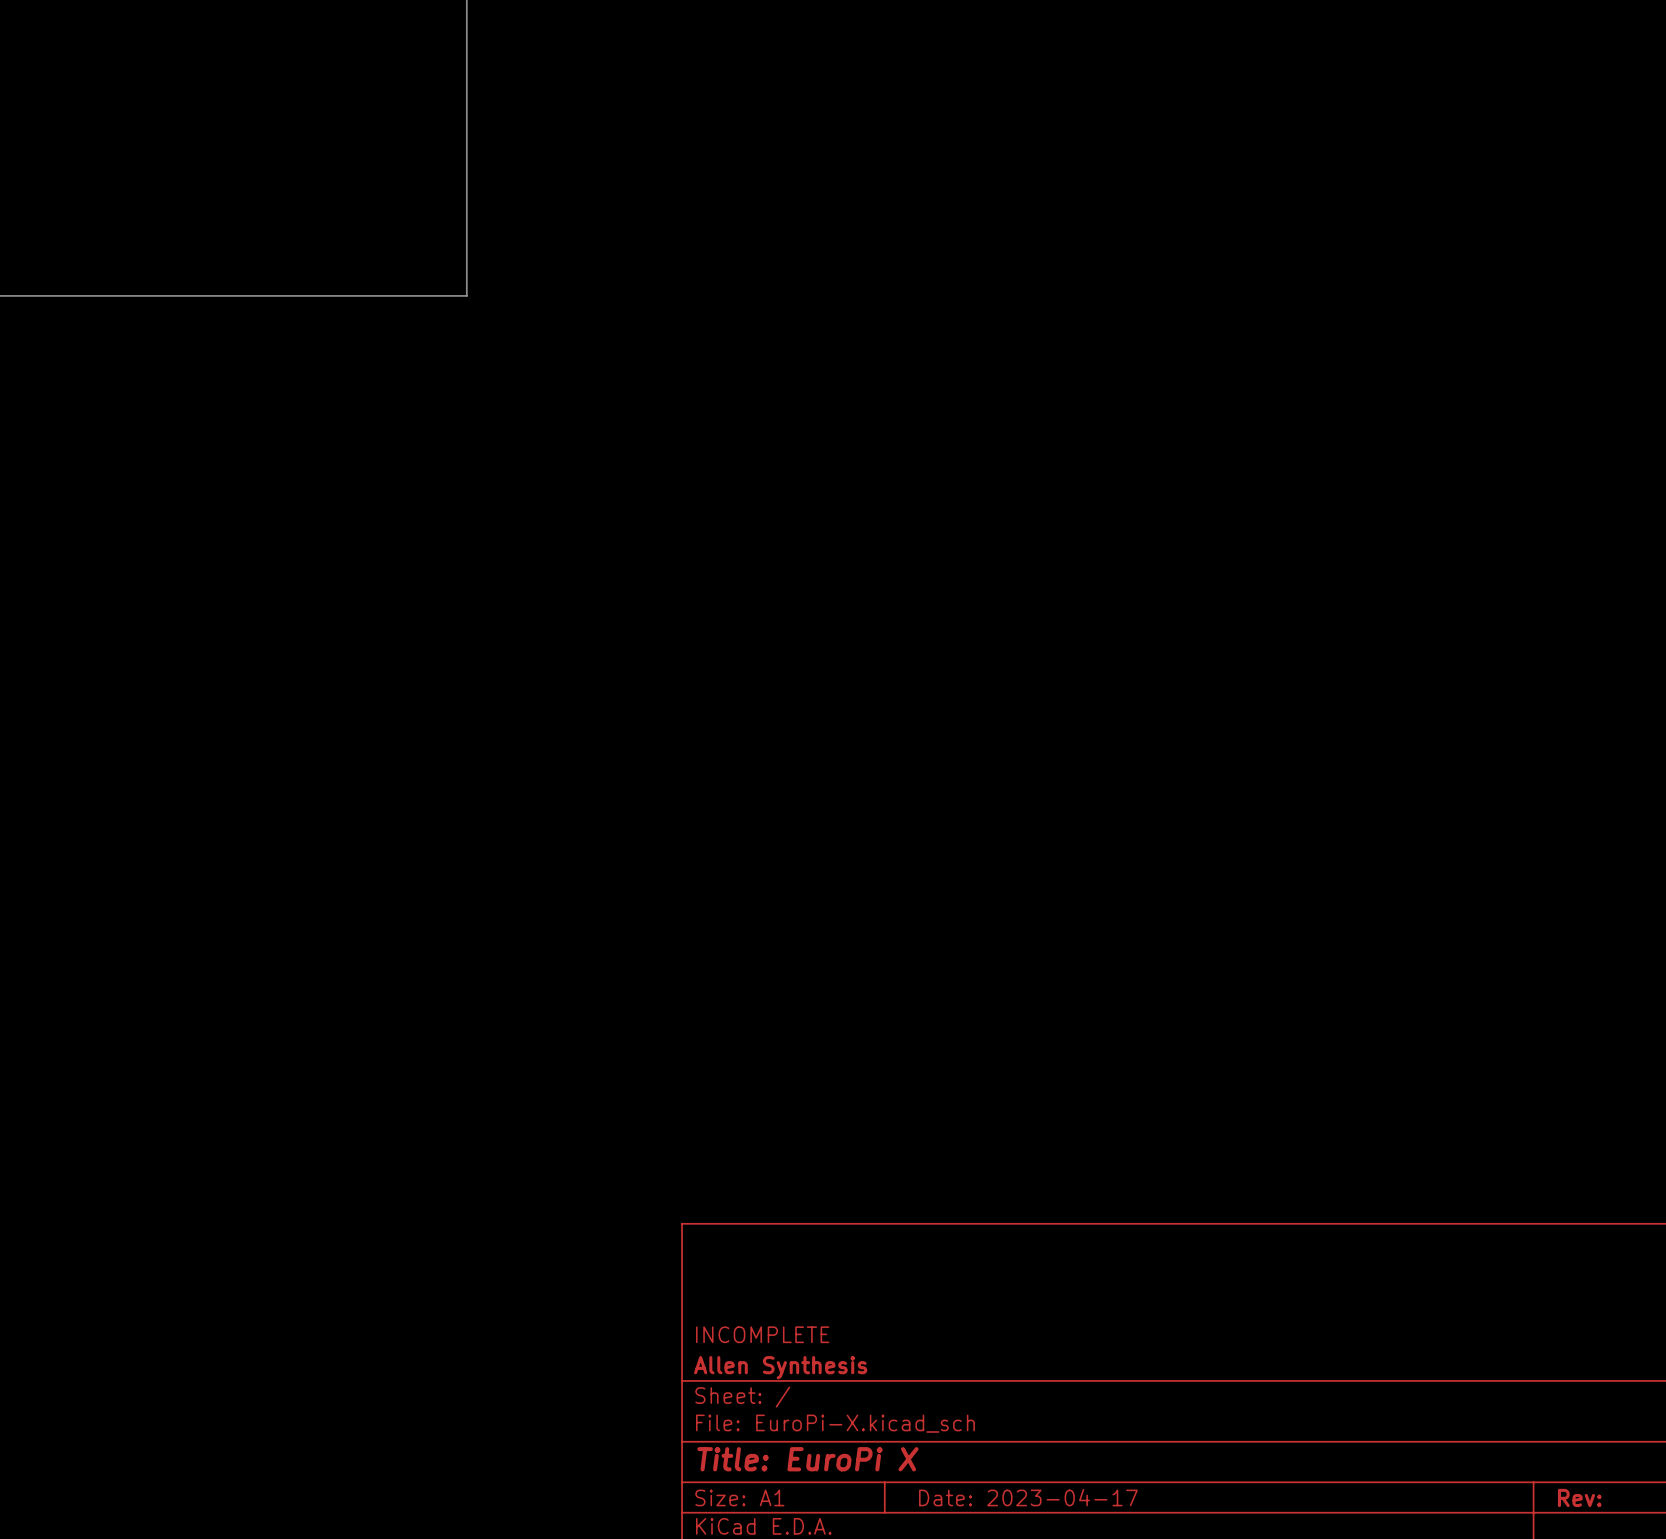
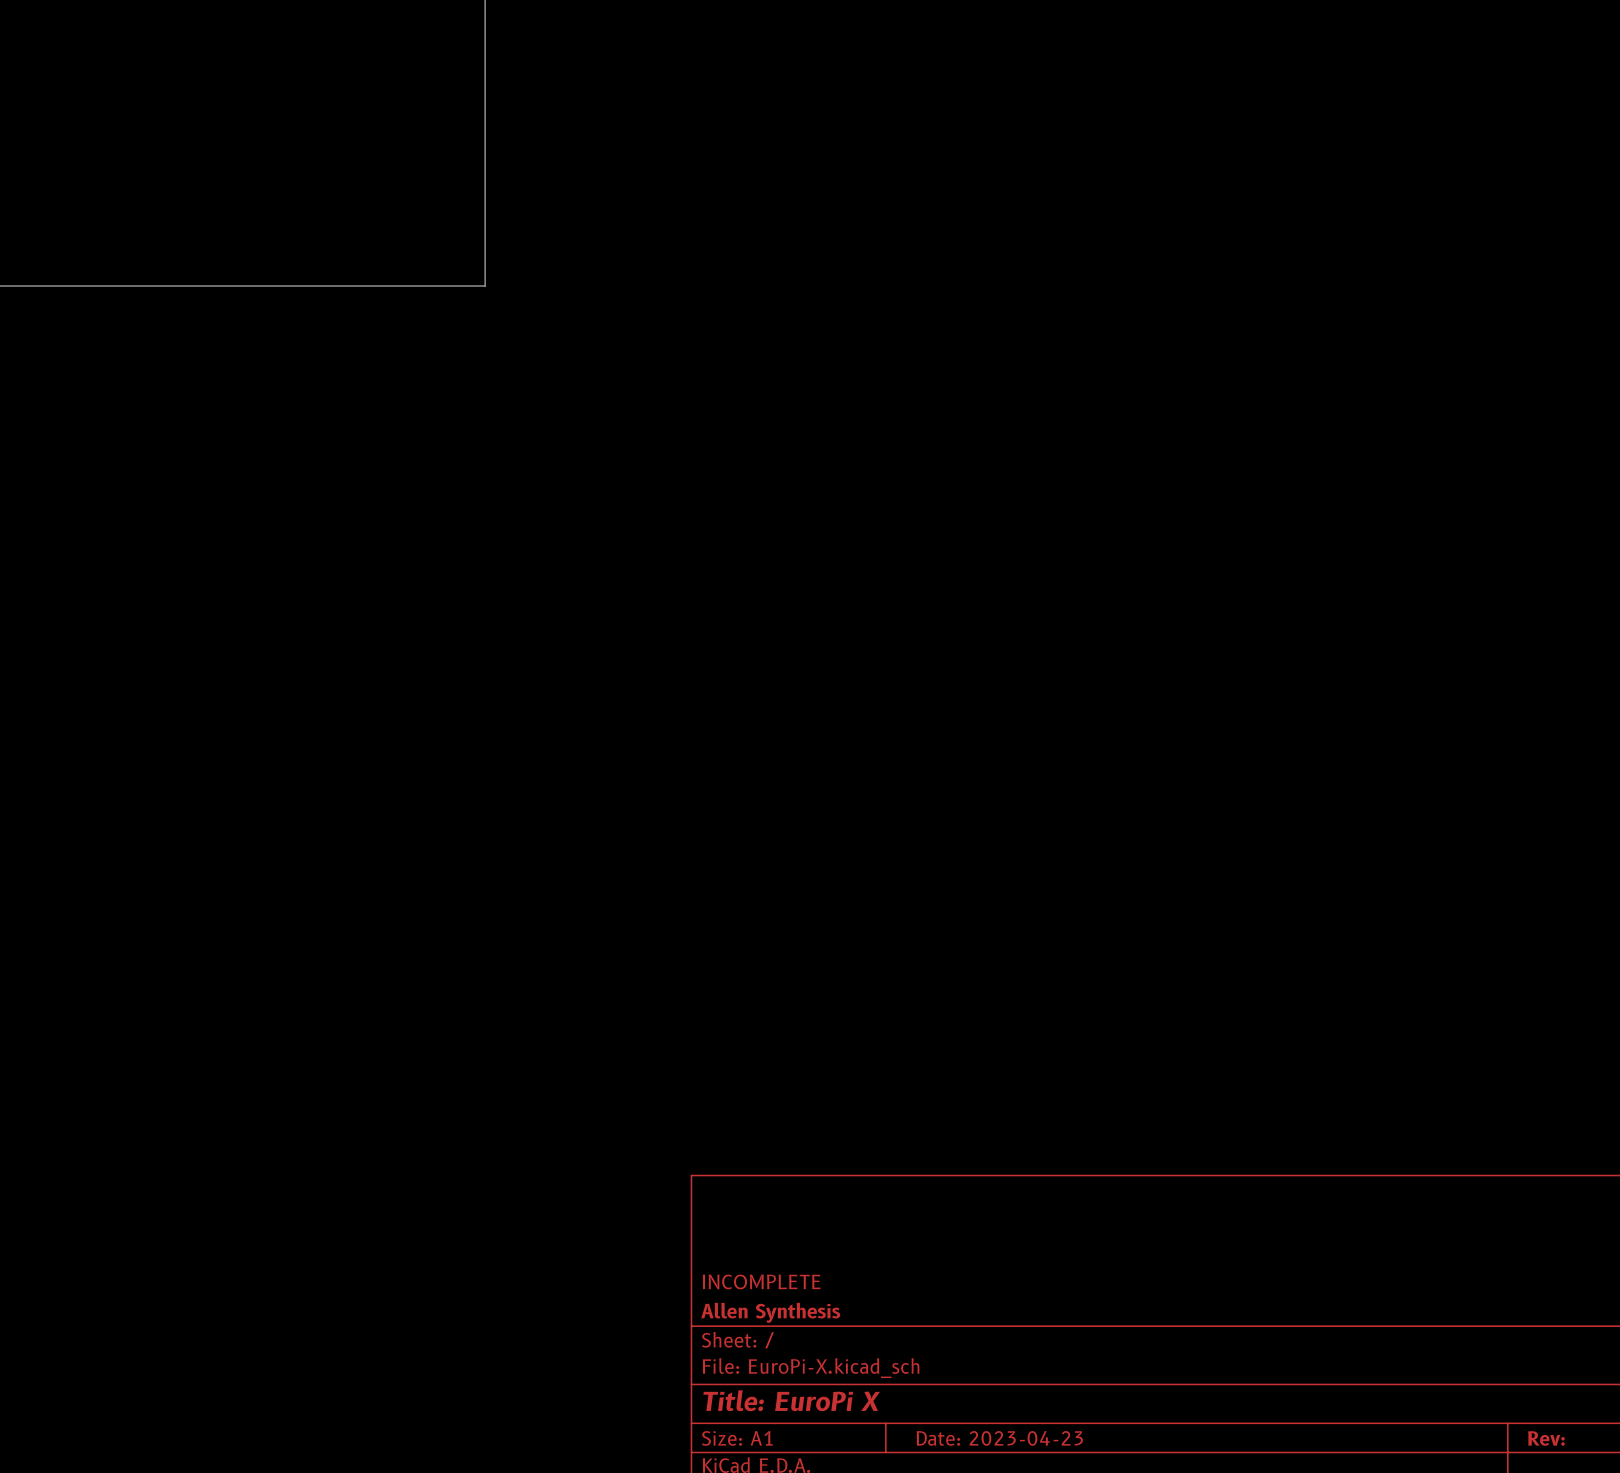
title block: Date: 2023-04-17 (1028, 1497) -> Date: 2023-04-23 (999, 1438)

